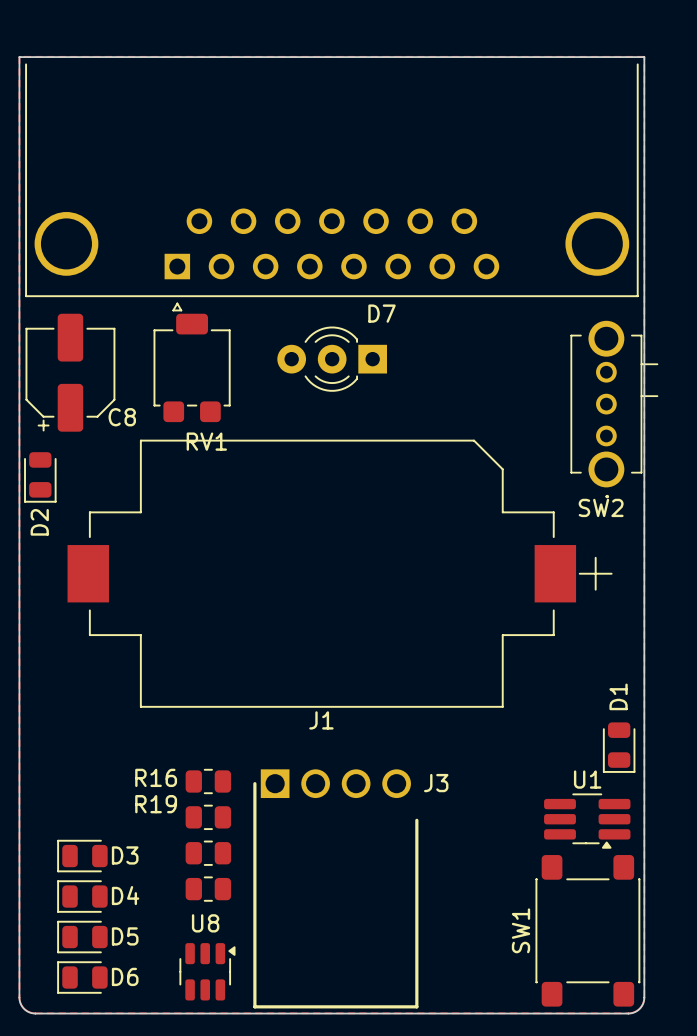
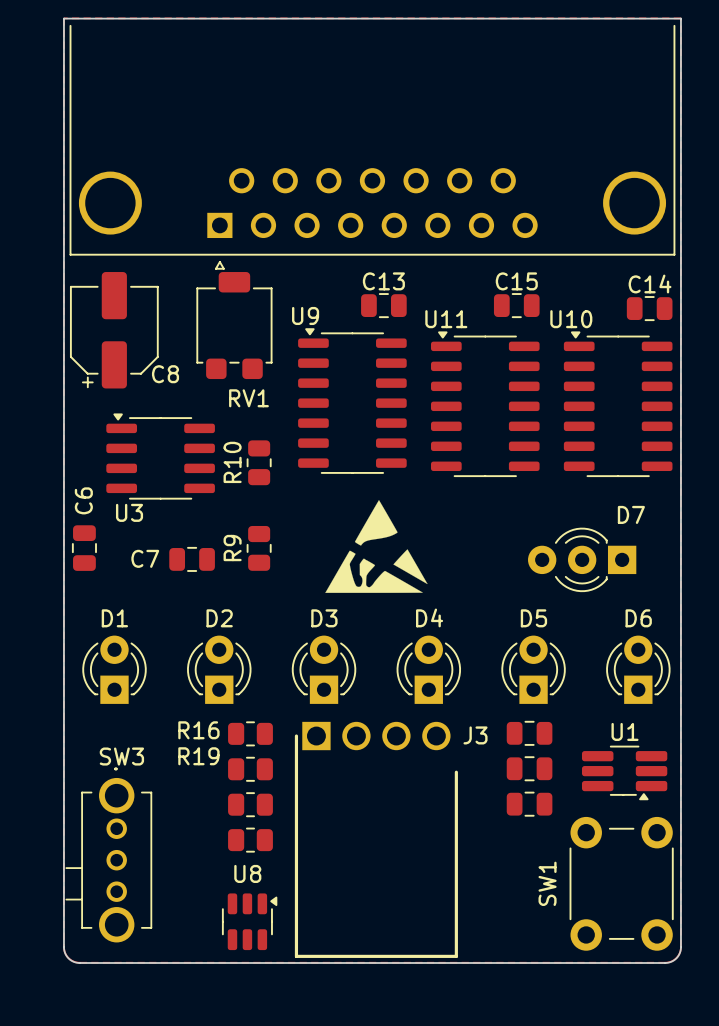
C13: none -> (383, 305)
C15: none -> (516, 305)
C14: none -> (649, 308)
D7 position: (332, 359) -> (582, 559)
SW2: (614, 409) -> none
U9: none -> (352, 401)
U11: none -> (485, 404)
U10: none -> (618, 404)
D2 footprint: [24, 452, 57, 503] -> [187, 635, 252, 704]
U3: none -> (160, 456)
R10: none -> (259, 462)
D2 name position: D2 (39, 522) -> D2 (219, 618)
drawing: none -> [325, 500, 428, 593]
J1: (340, 573) -> none
C6: none -> (84, 548)
R9: none -> (259, 548)
C7: none -> (192, 559)
D1 footprint: [602, 722, 636, 773] -> [82, 635, 147, 704]
part: none -> (529, 733)
part: none -> (529, 768)
D3 footprint: [57, 839, 108, 873] -> [291, 635, 357, 704]
part: none -> (529, 804)
D3 name position: D3 (125, 855) -> D3 (324, 618)
SW1 footprint: [535, 855, 641, 1007] -> [569, 816, 674, 951]
D4 footprint: [57, 880, 108, 913] -> [396, 635, 462, 704]
D4 name position: D4 (125, 895) -> D4 (429, 617)
SW3: none -> (108, 854)
D5 footprint: [57, 920, 108, 954] -> [501, 635, 566, 704]
D5 name position: D5 (125, 936) -> D5 (533, 618)
D6 footprint: [57, 961, 108, 994] -> [606, 635, 671, 704]
D6 name position: D6 (125, 976) -> D6 (638, 618)

